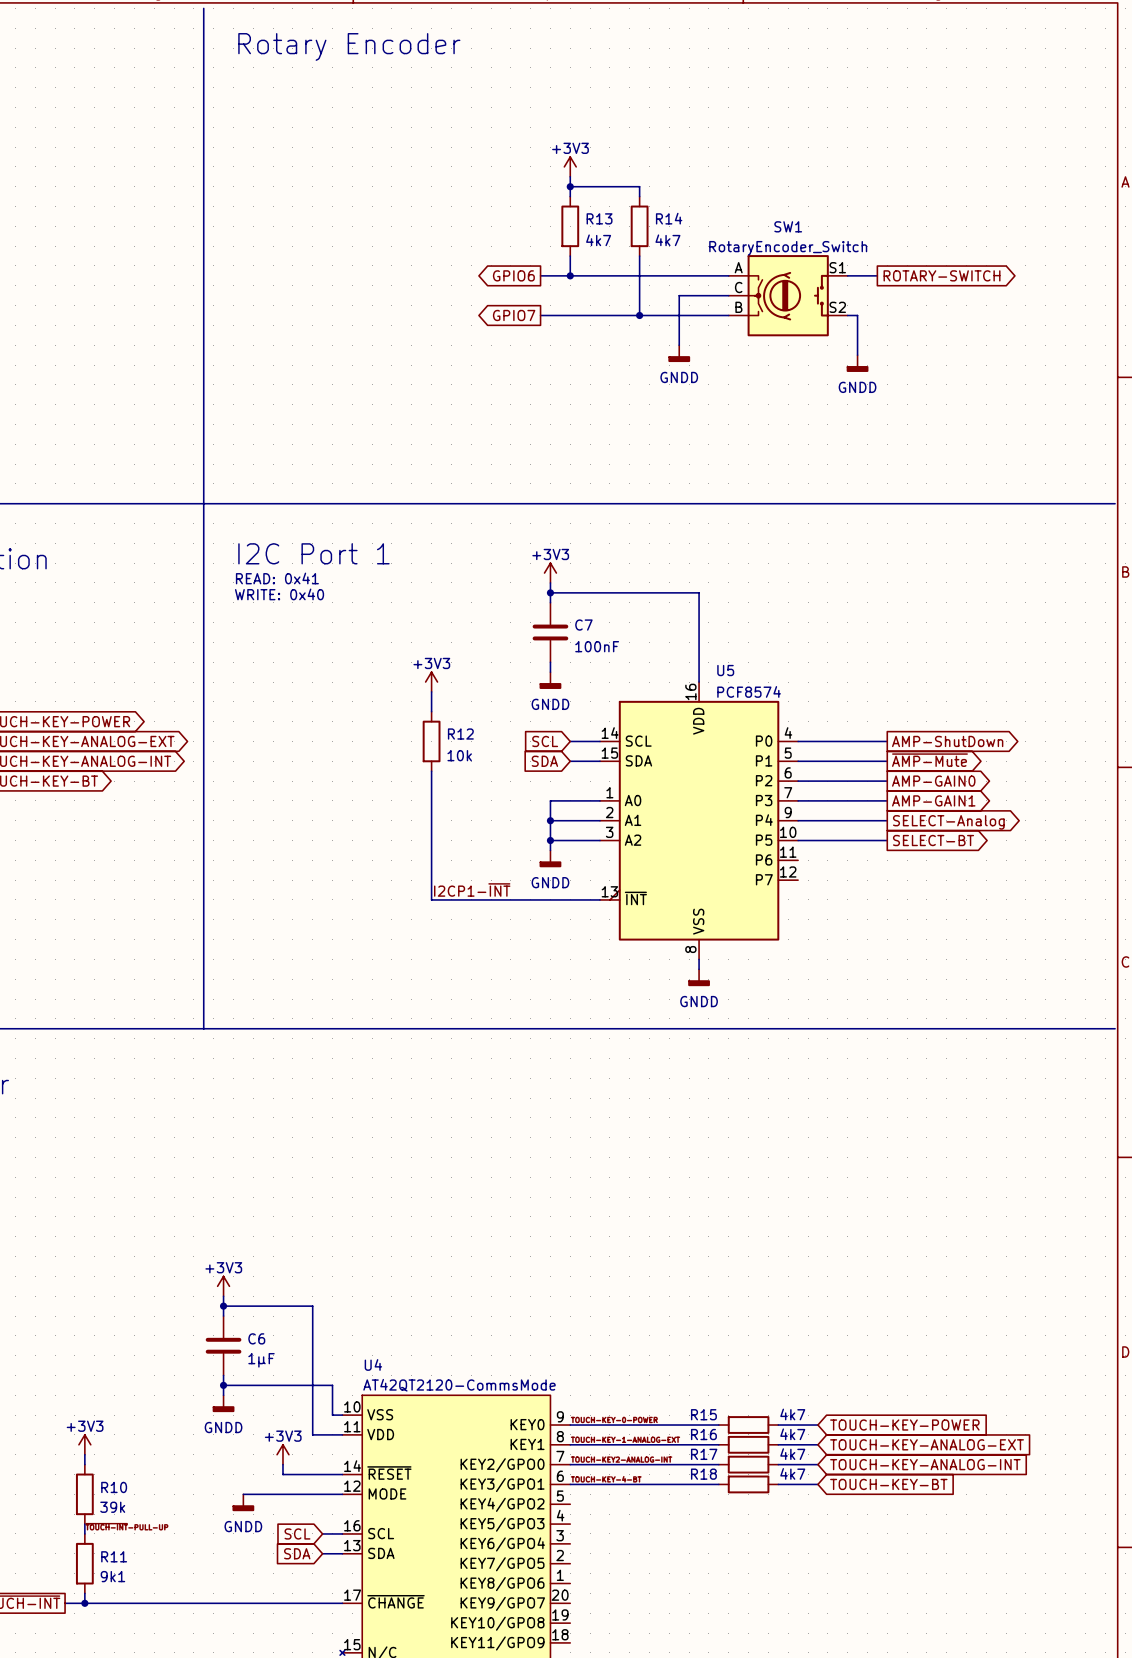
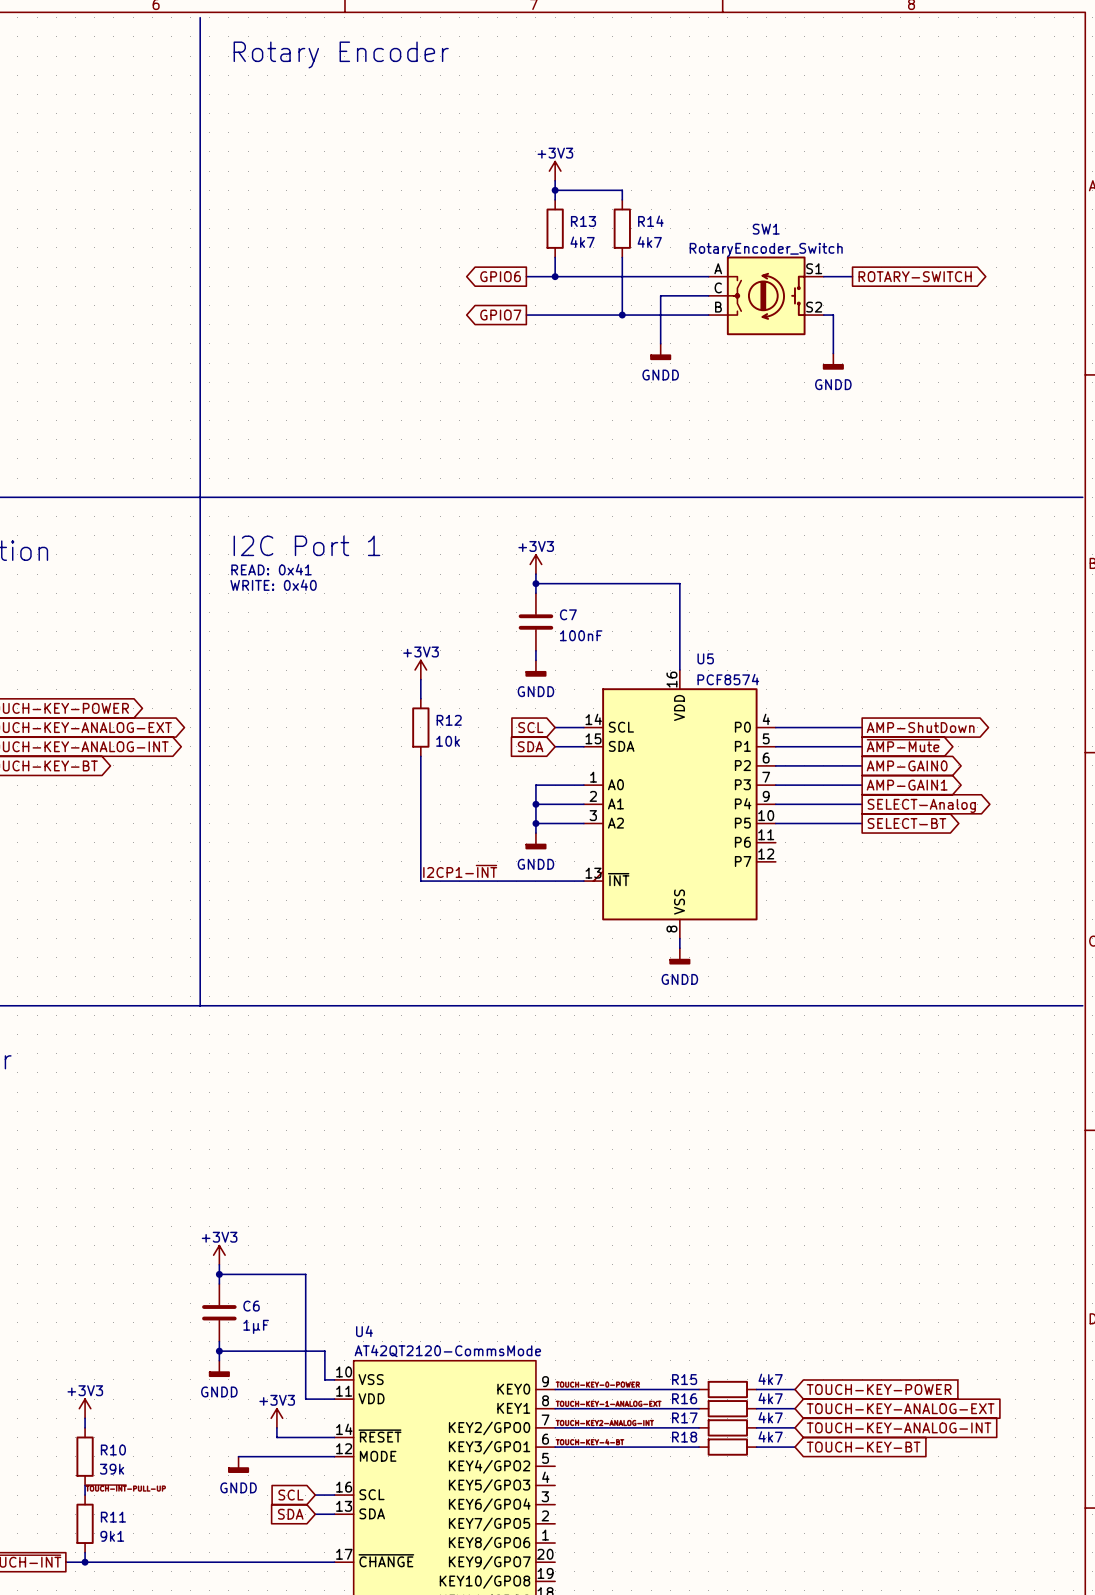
SW1 symbol: [728, 255, 848, 337] -> [708, 256, 824, 336]

